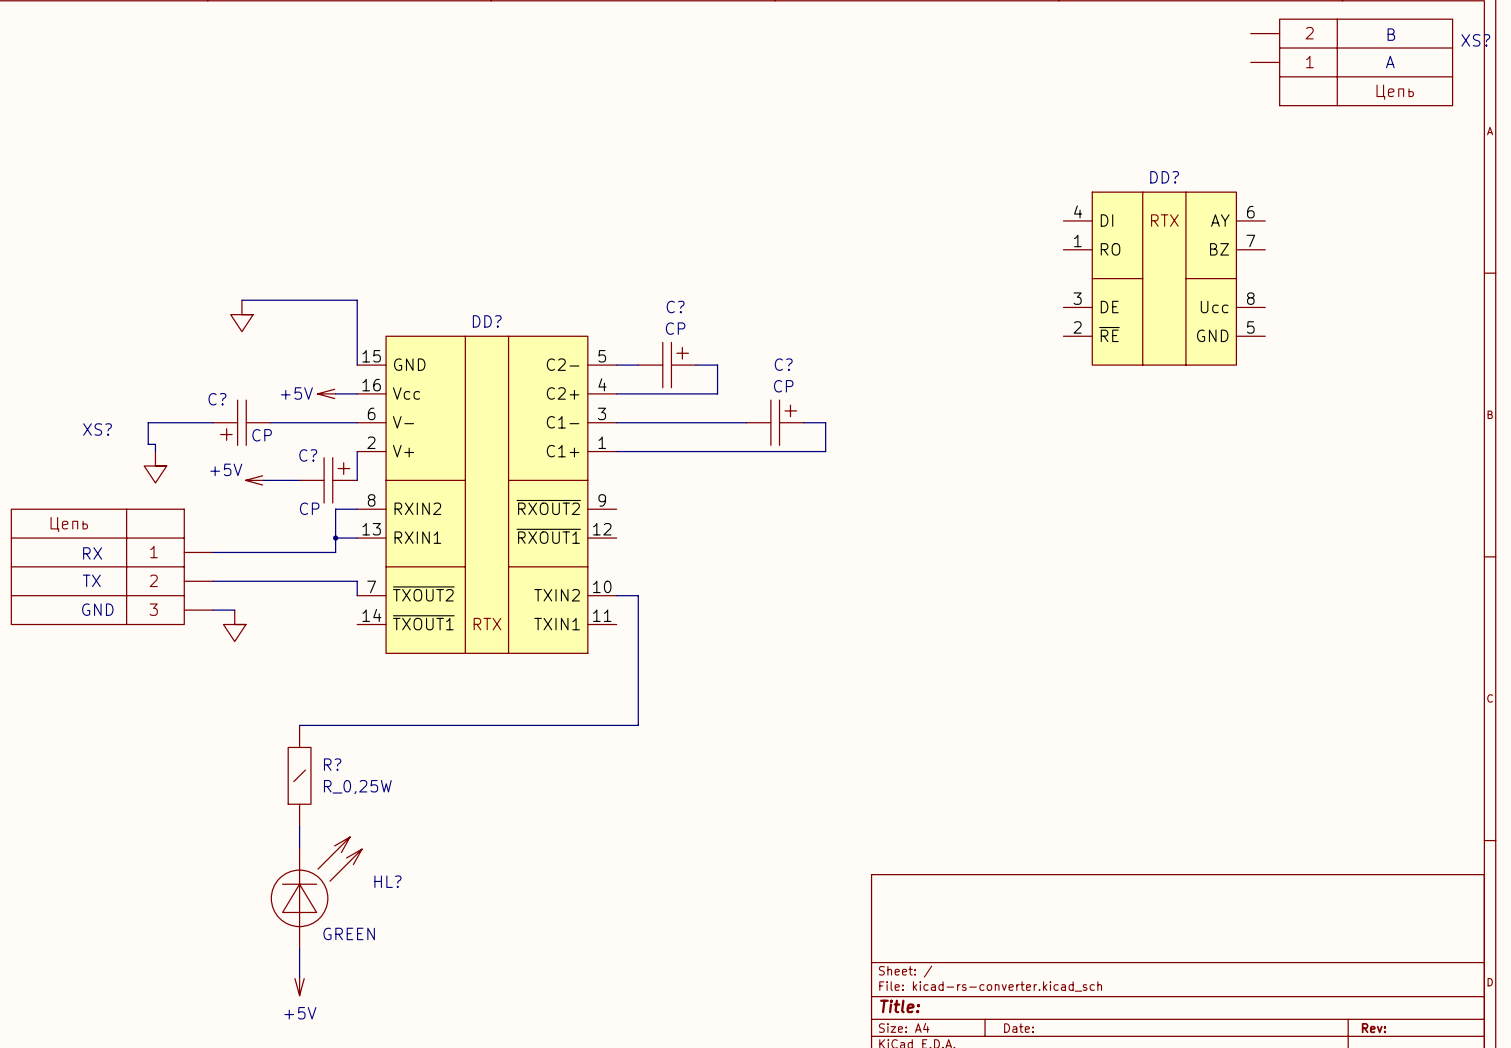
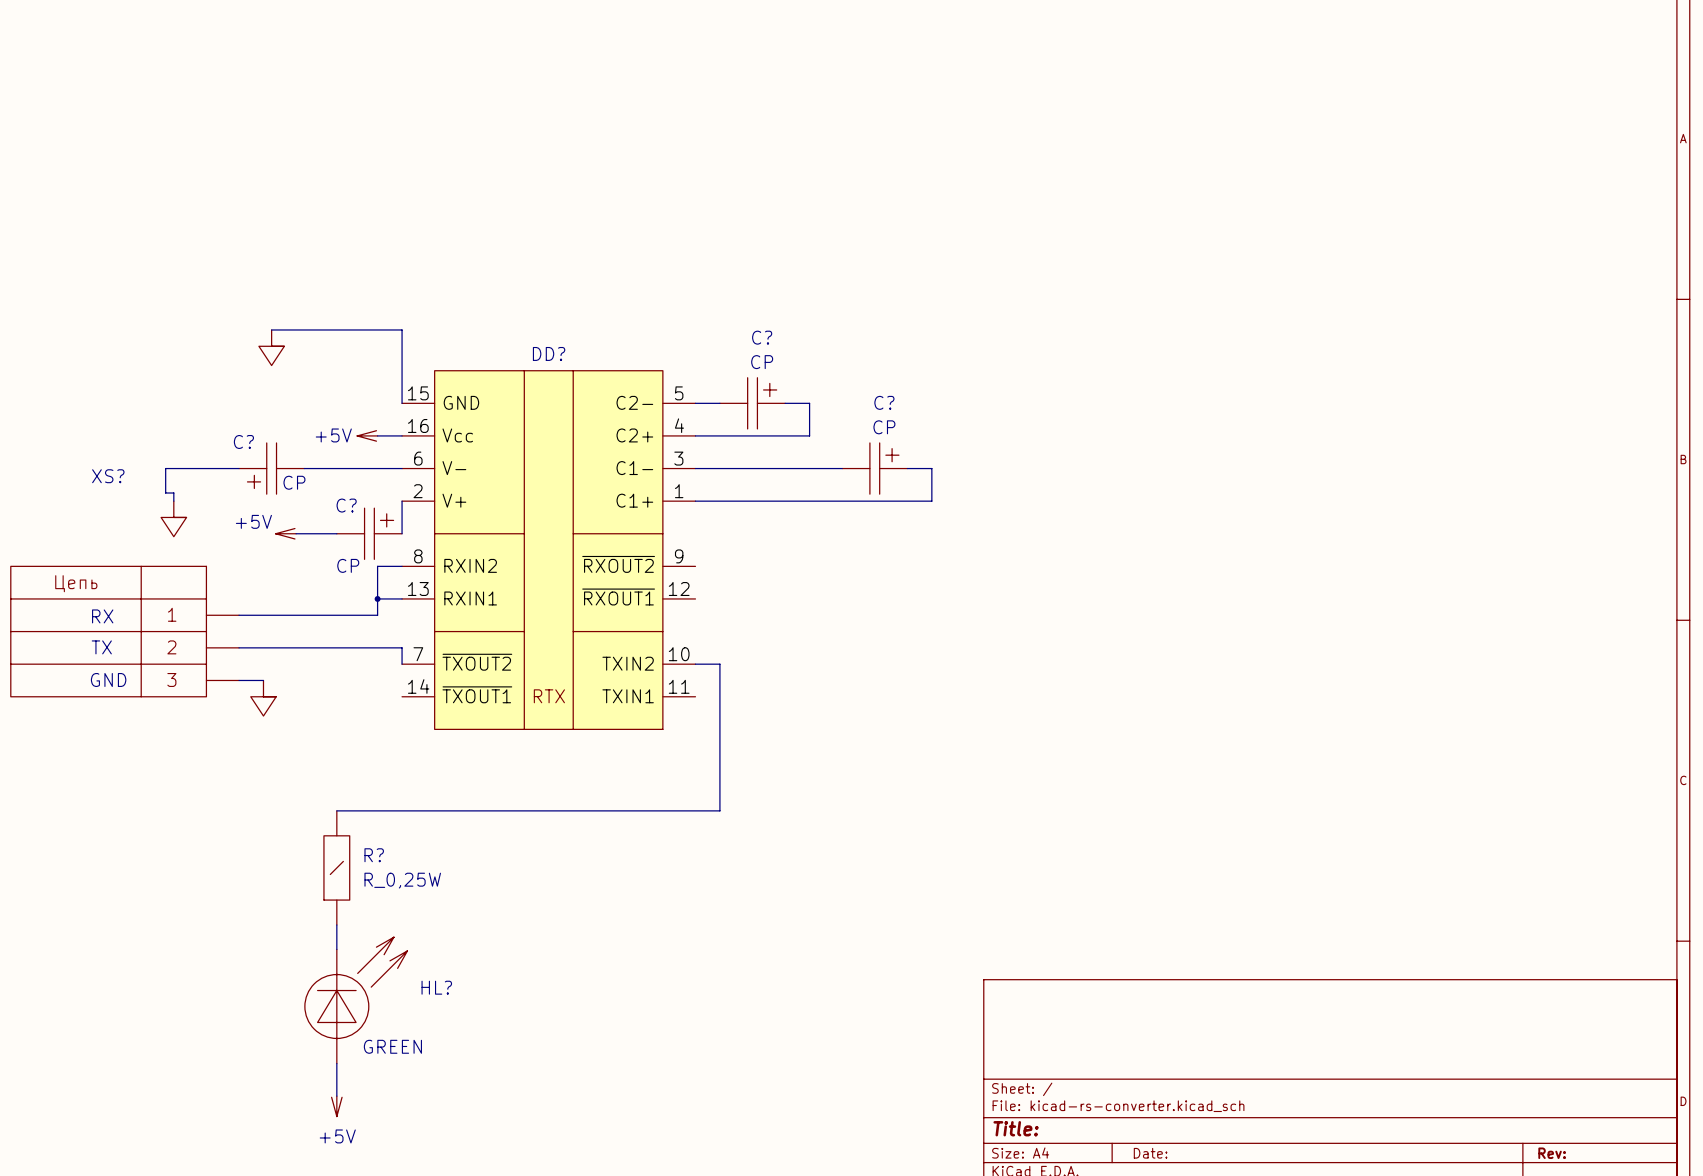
XS?: (1351, 62) -> none
DD?: (1164, 278) -> none

